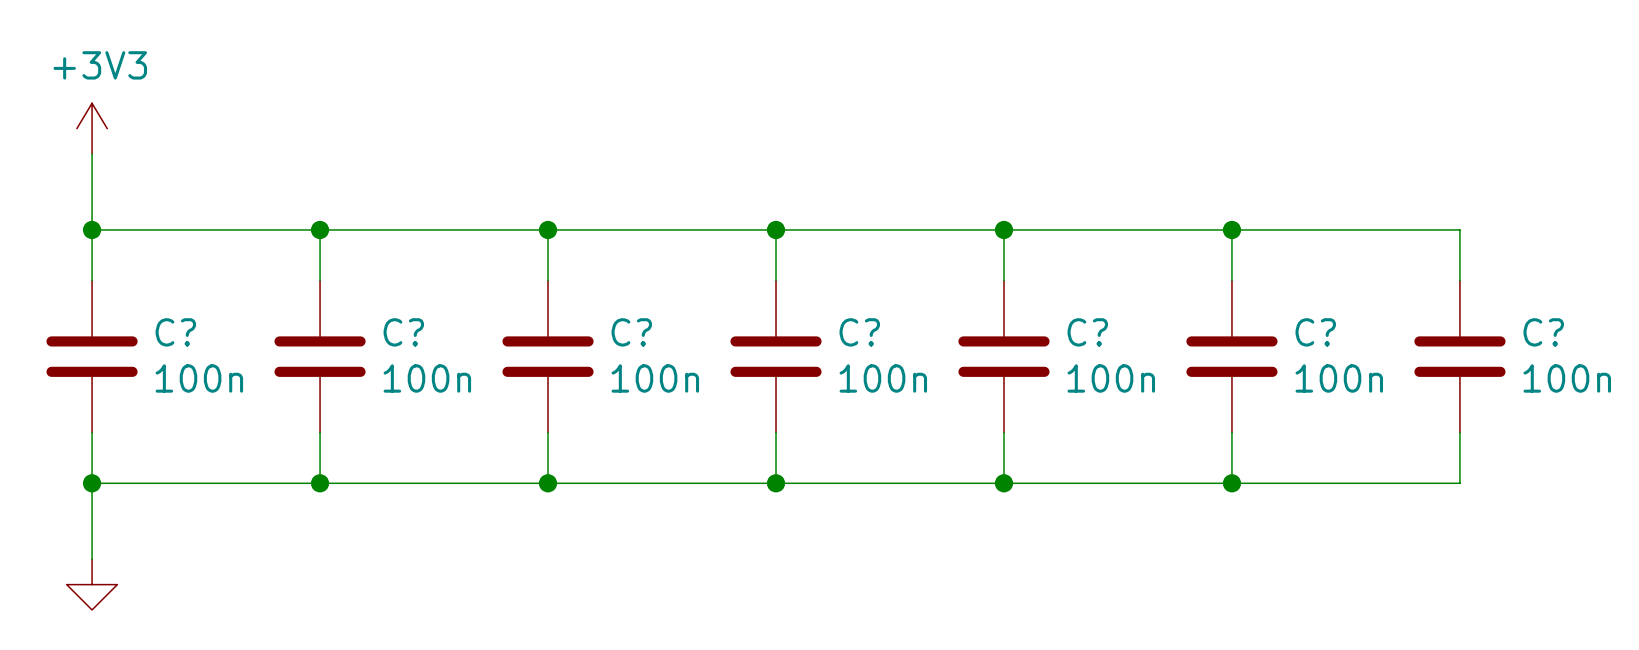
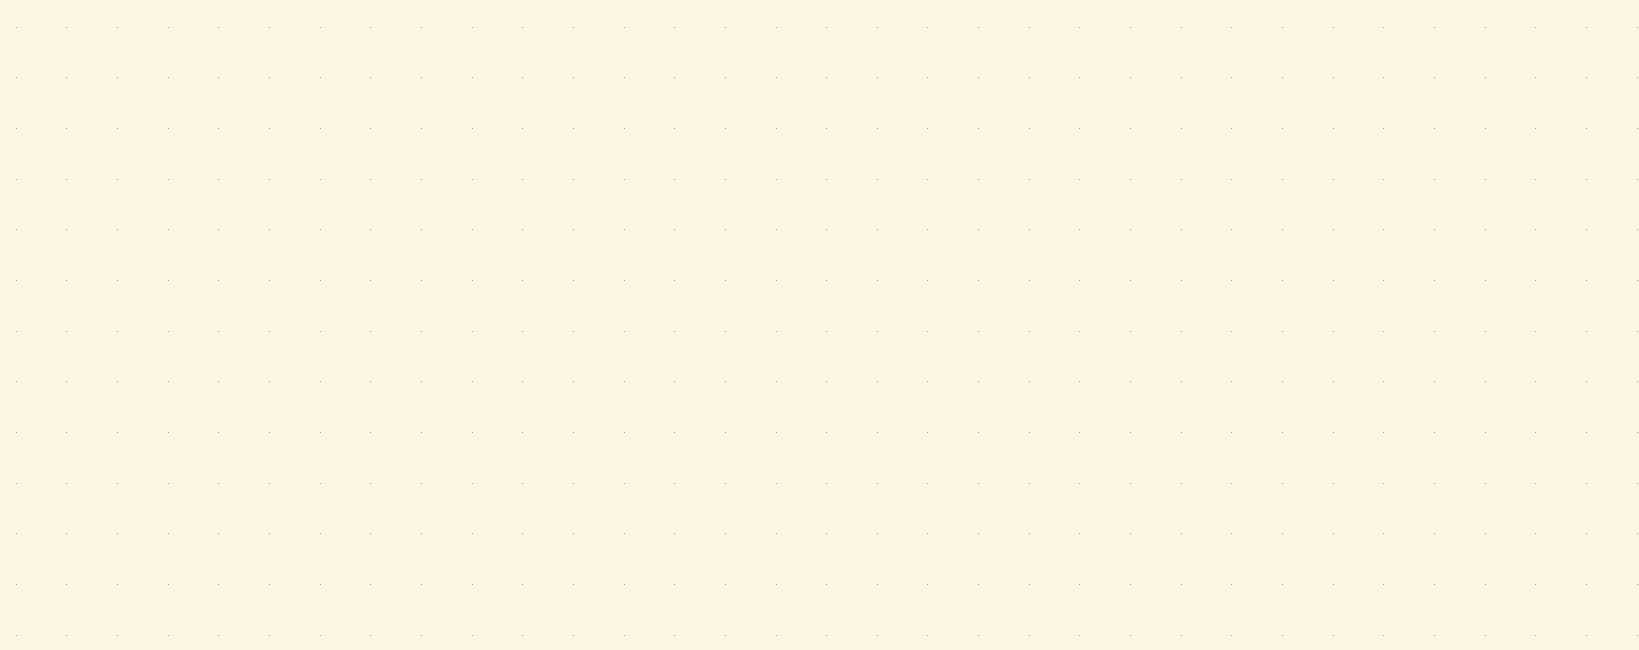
power symbol: +3V3 (92, 128) -> none
wire: (92, 153) (92, 280) -> none
wire: (92, 229) (1459, 229) (1459, 280) -> none
junction: (92, 229) -> none
wire: (320, 229) (320, 280) -> none
junction: (320, 229) -> none
wire: (548, 229) (548, 280) -> none
junction: (548, 229) -> none
wire: (776, 229) (776, 280) -> none
junction: (776, 229) -> none
wire: (1003, 229) (1003, 280) -> none
junction: (1003, 229) -> none
wire: (1231, 229) (1231, 280) -> none
junction: (1231, 229) -> none
C?: 100n (92, 356) -> none
C?: 100n (320, 356) -> none
C?: 100n (548, 356) -> none
C?: 100n (776, 356) -> none
C?: 100n (1003, 356) -> none
C?: 100n (1231, 356) -> none
C?: 100n (1459, 356) -> none
wire: (92, 432) (92, 559) -> none
wire: (320, 432) (320, 483) -> none
wire: (548, 432) (548, 483) -> none
wire: (776, 432) (776, 483) -> none
wire: (1003, 432) (1003, 483) -> none
wire: (1231, 432) (1231, 483) -> none
wire: (1459, 432) (1459, 483) (92, 483) -> none
junction: (92, 483) -> none
junction: (320, 483) -> none
junction: (548, 483) -> none
junction: (776, 483) -> none
junction: (1003, 483) -> none
junction: (1231, 483) -> none
power symbol: (92, 584) -> none

